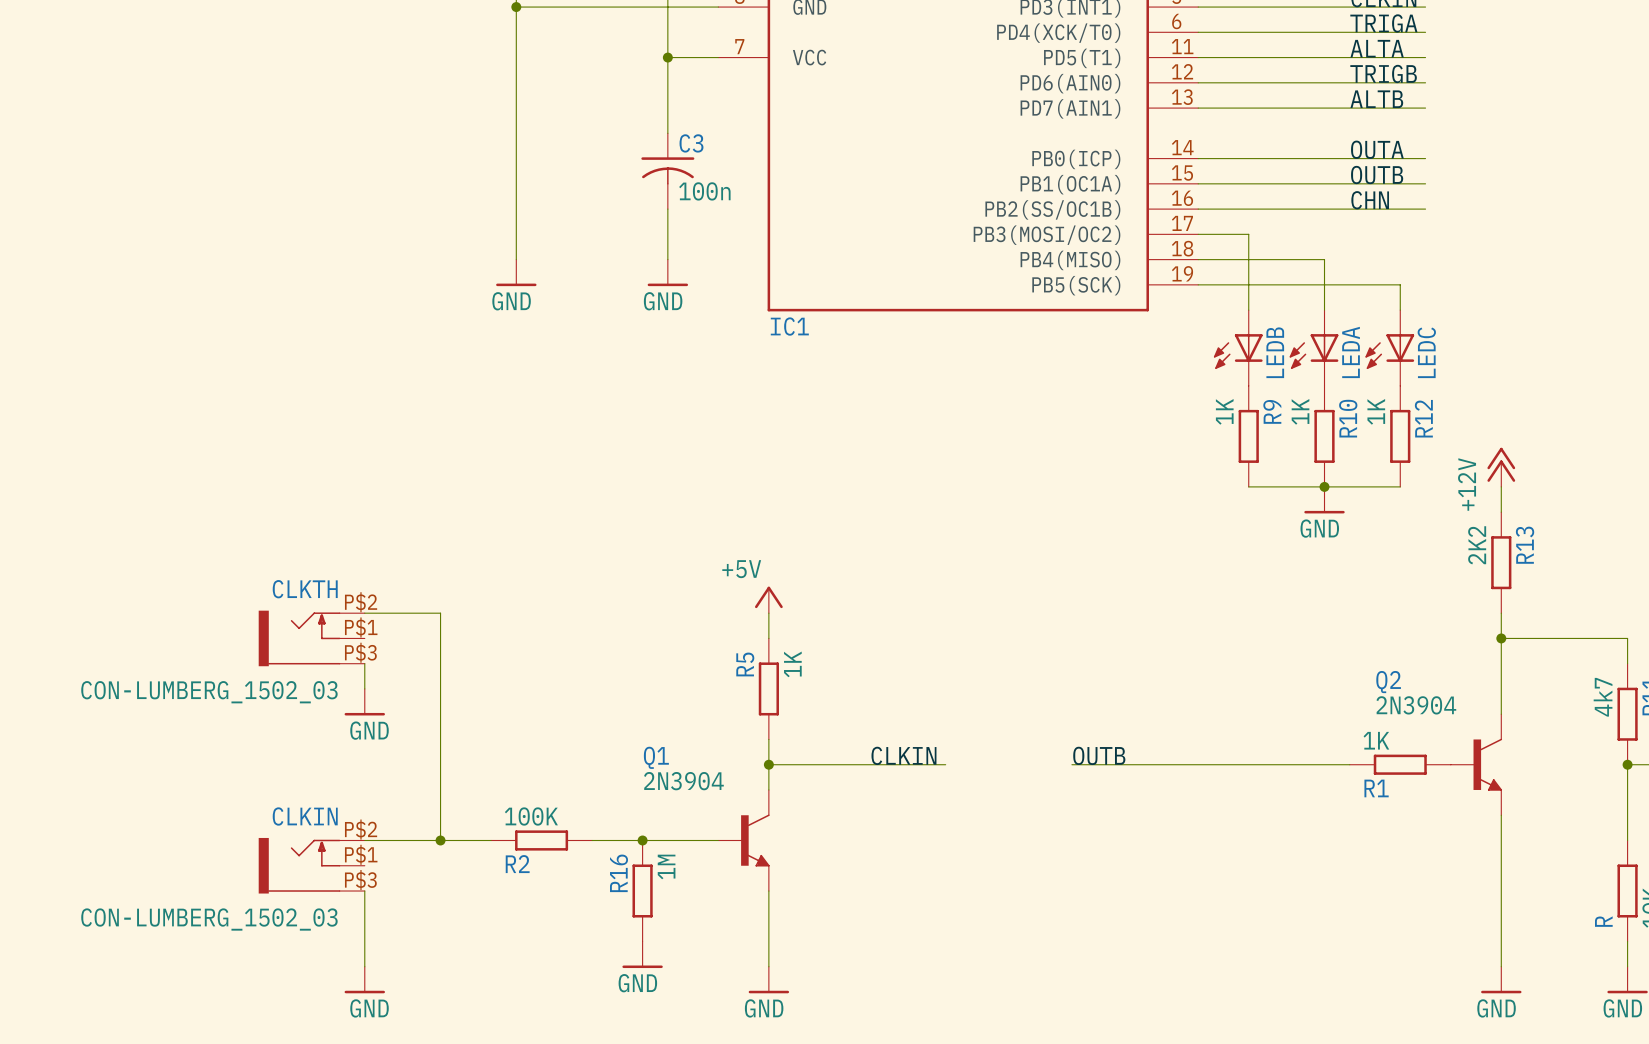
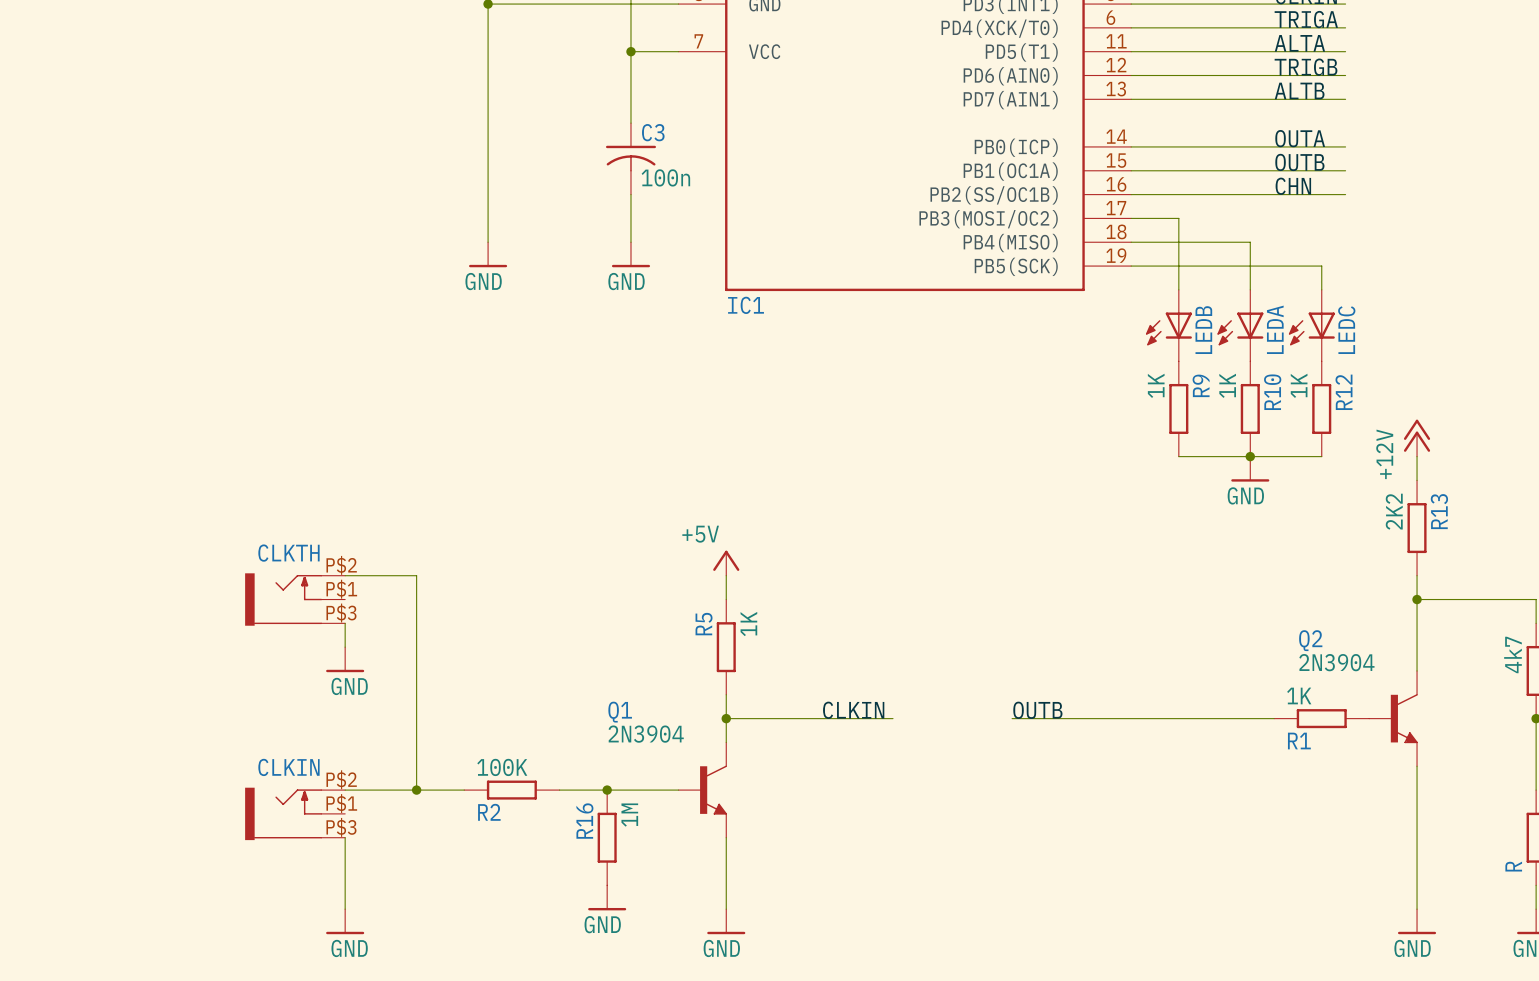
CLKTH value: CON-LUMBERG_1502_03 (209, 692) -> none
CLKIN value: CON-LUMBERG_1502_03 (209, 919) -> none

